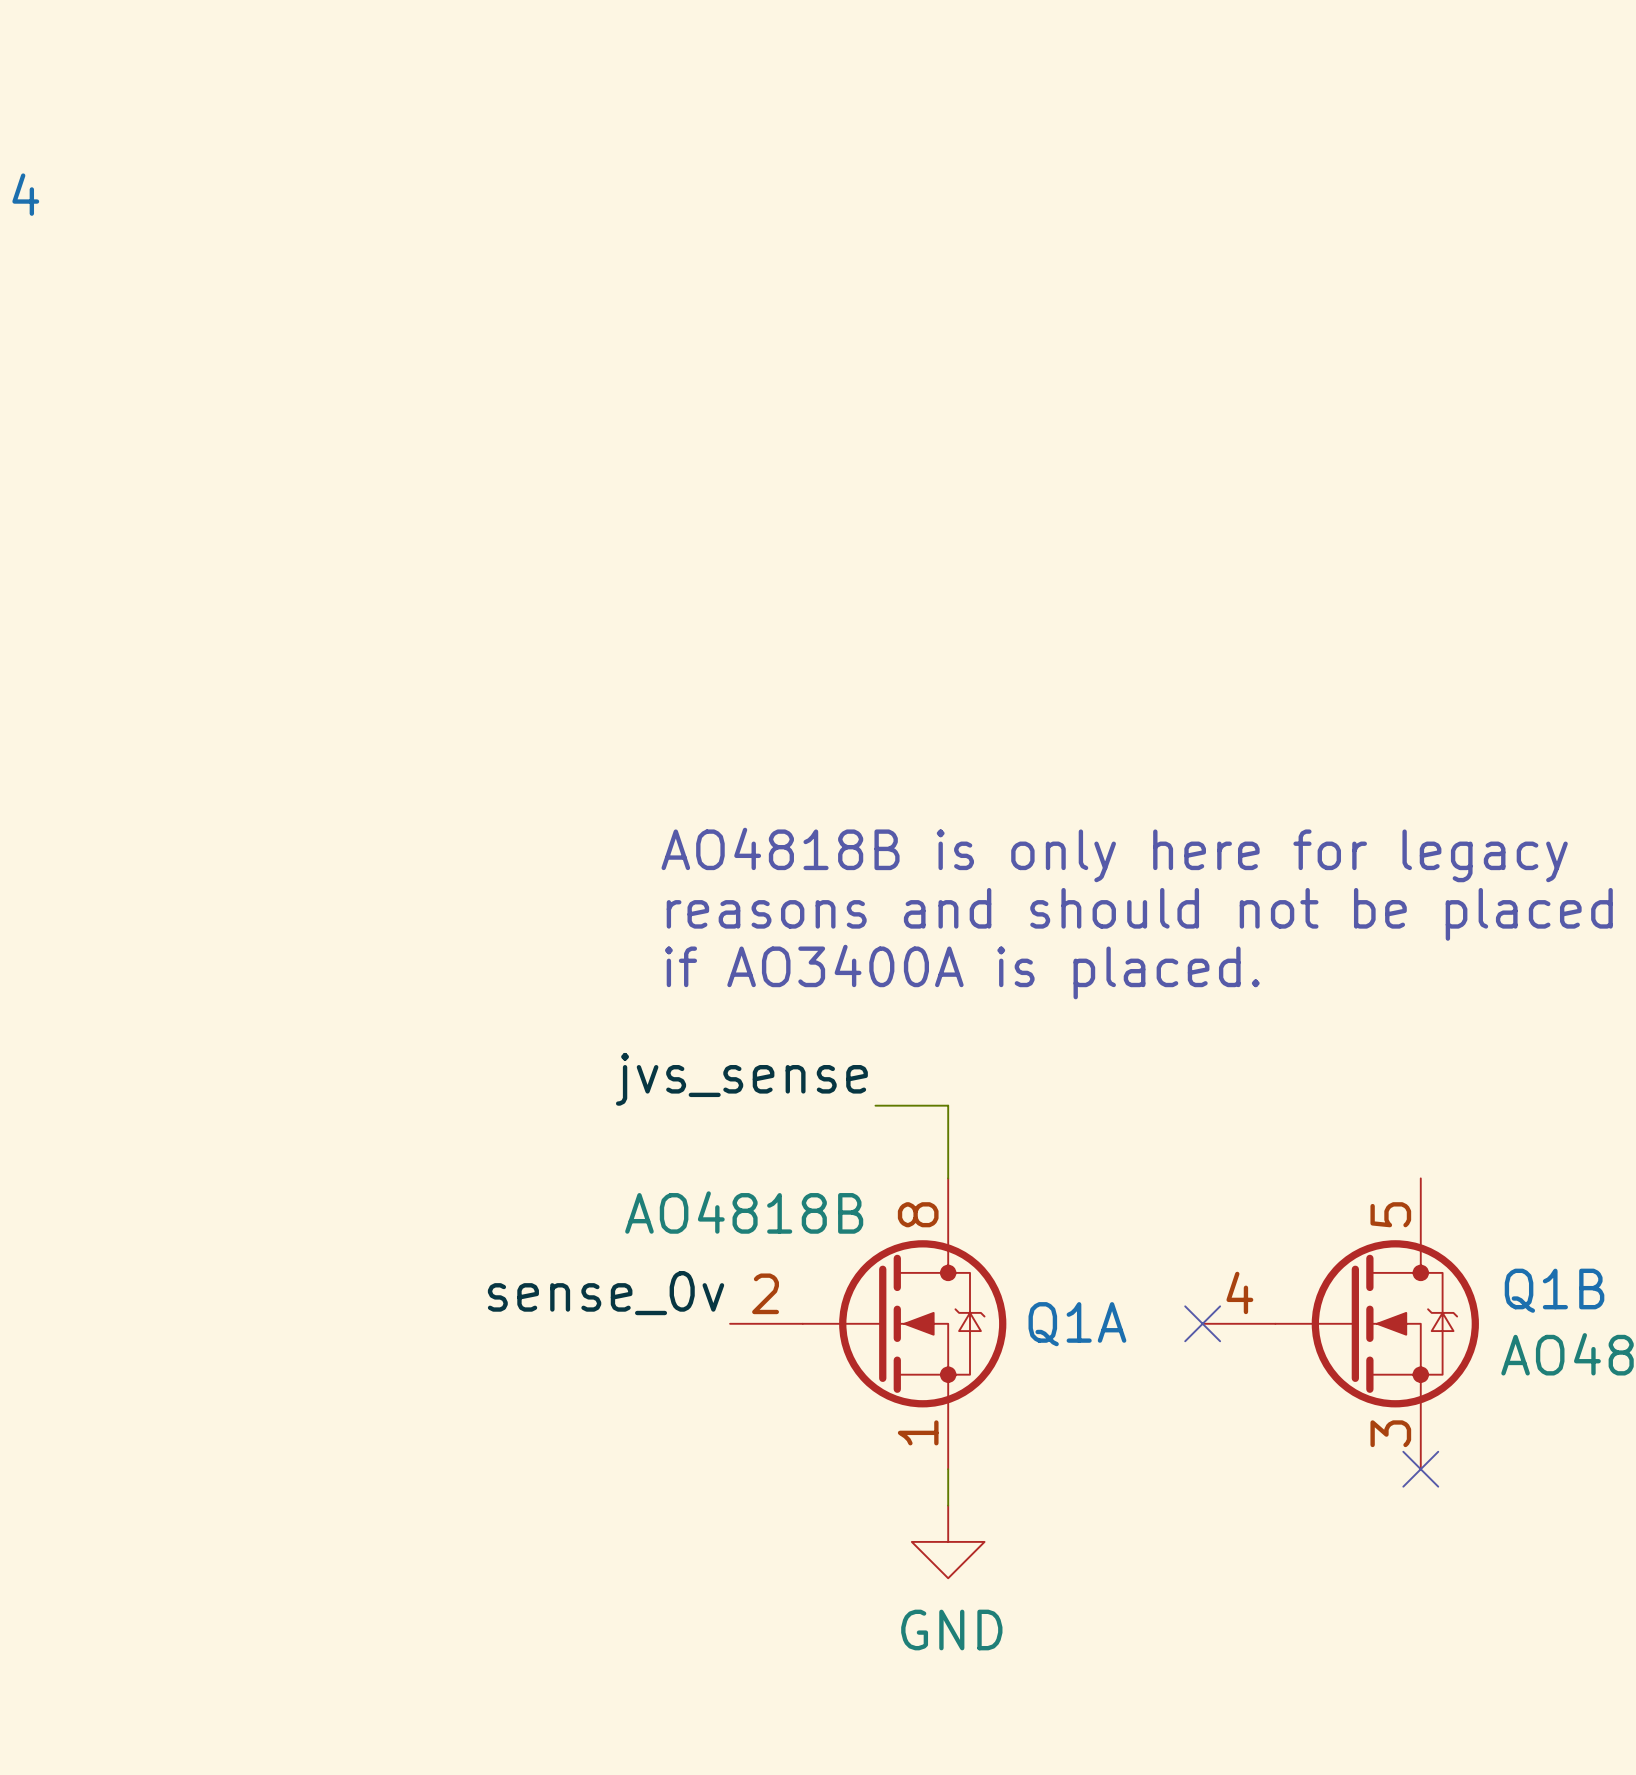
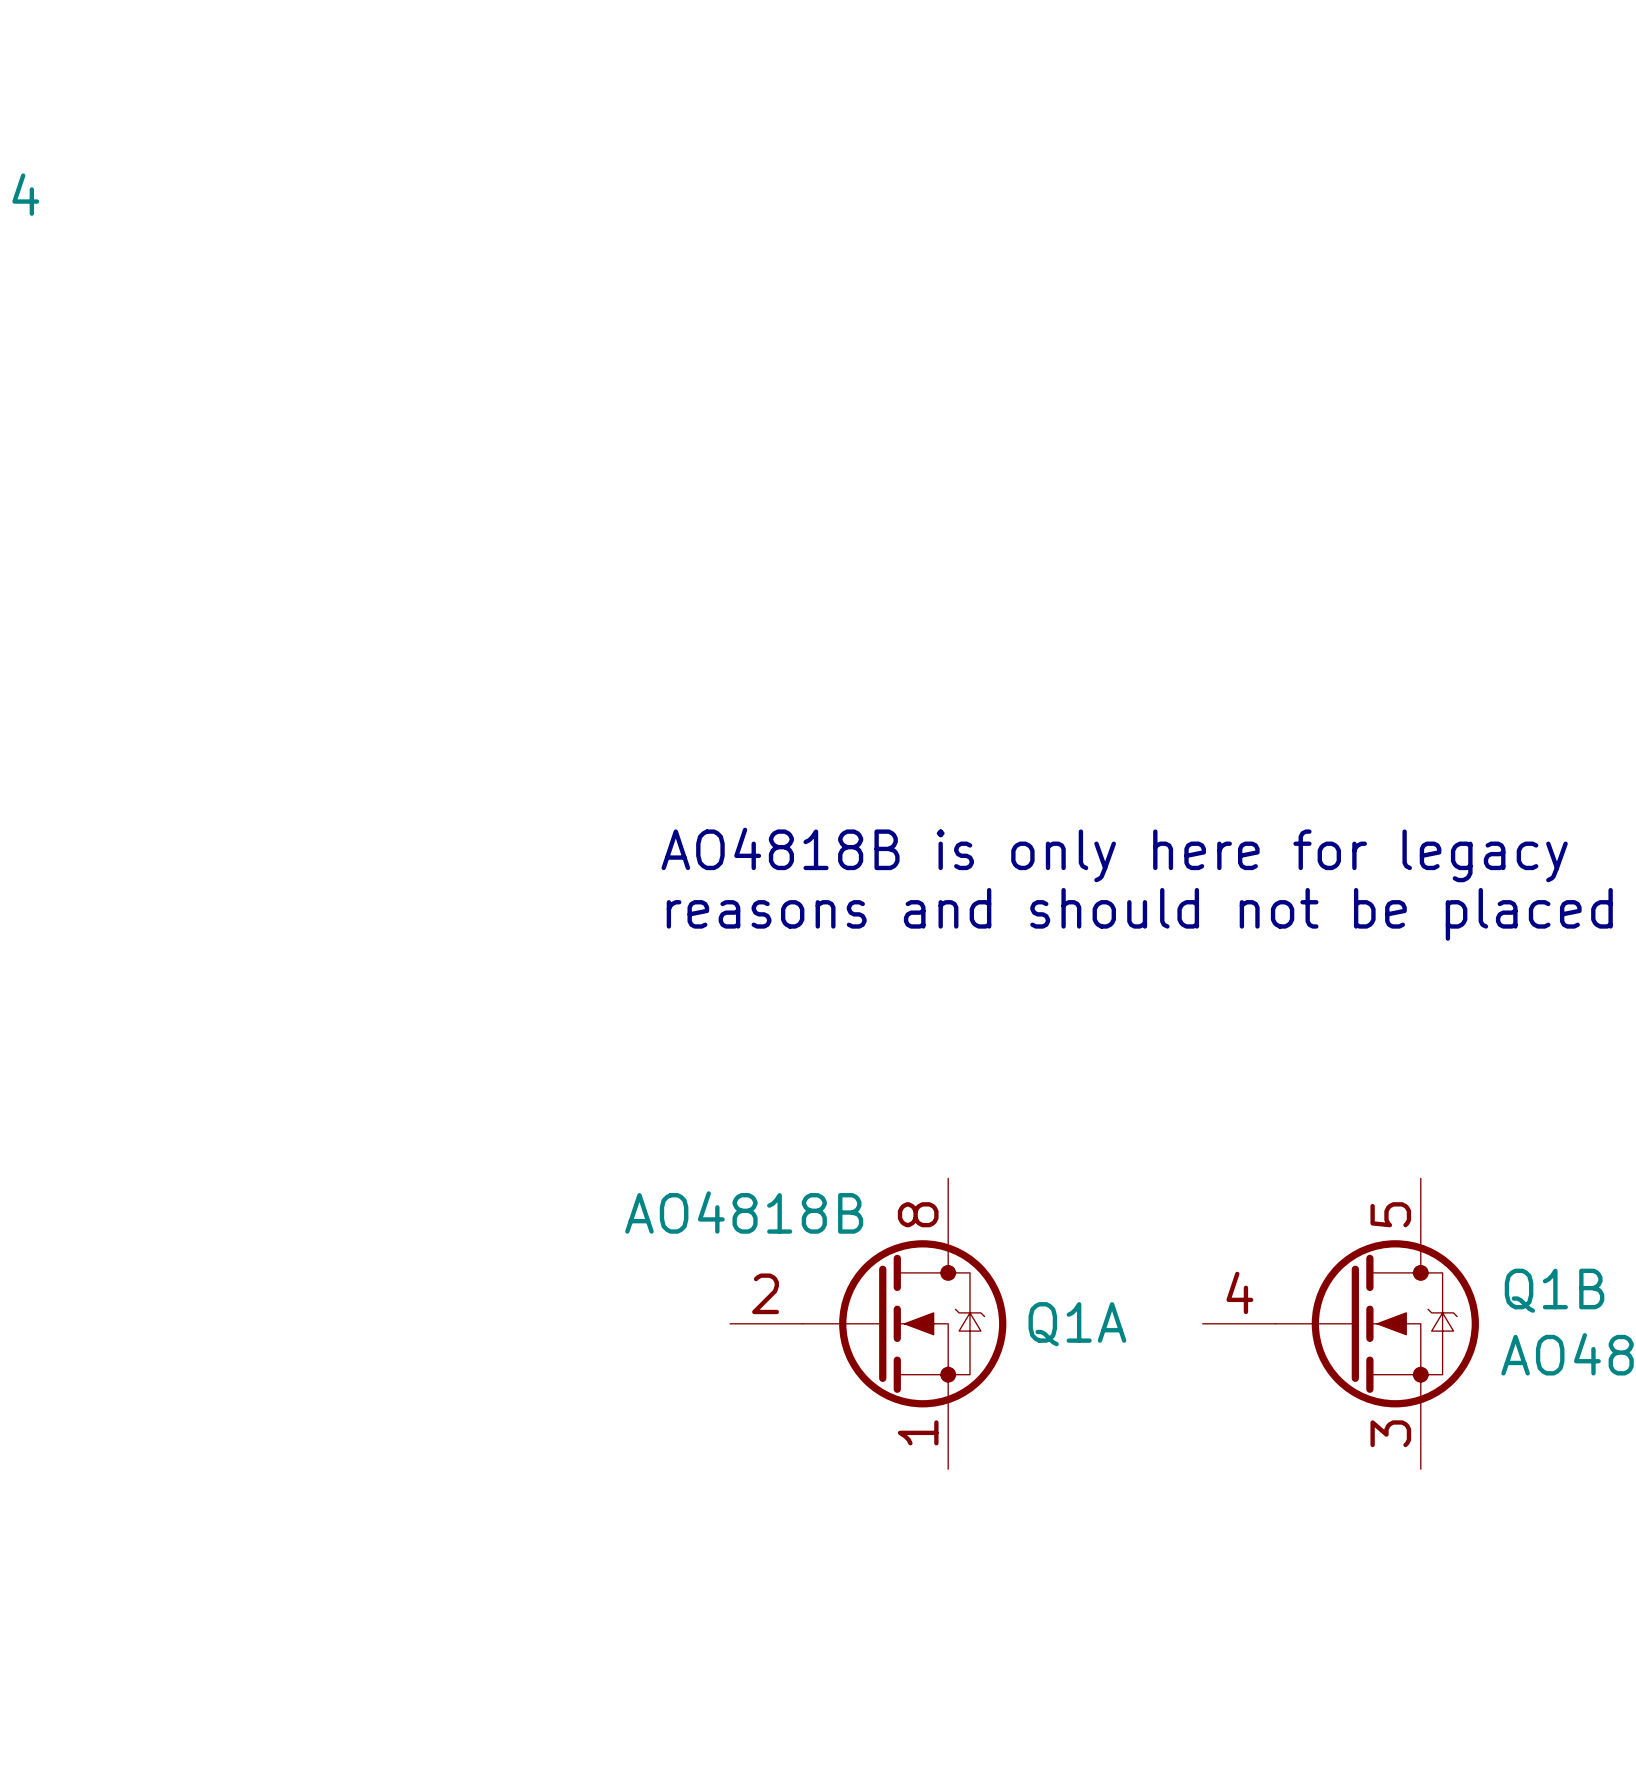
text: if AO3400A is placed. (962, 972) -> none
label: jvs_sense (741, 1079) -> none
wire: (875, 1105) (948, 1105) (948, 1178) -> none
label: sense_0v (606, 1293) -> none
no-connect mark: (1202, 1323) -> none
wire: (948, 1469) (948, 1505) -> none
no-connect mark: (1420, 1469) -> none
power symbol: GND (948, 1541) -> none

